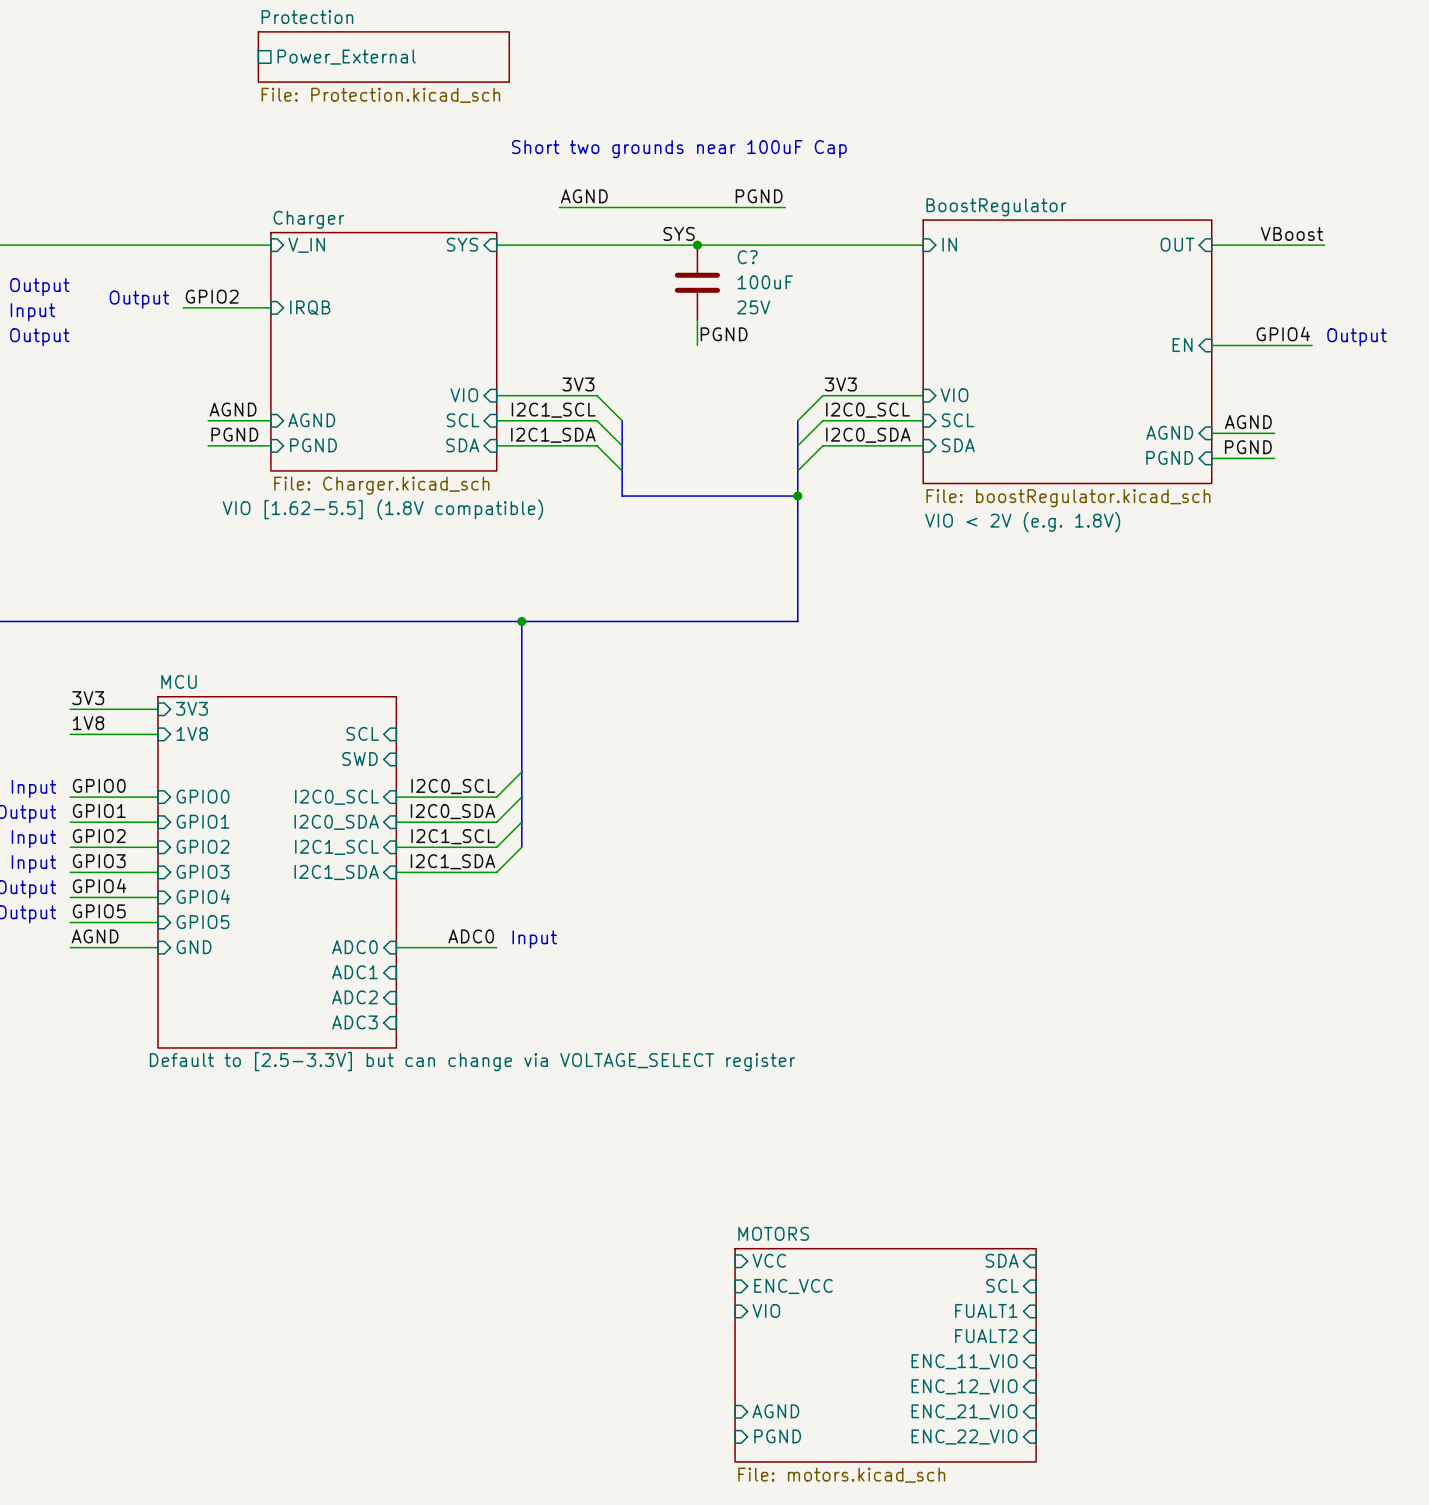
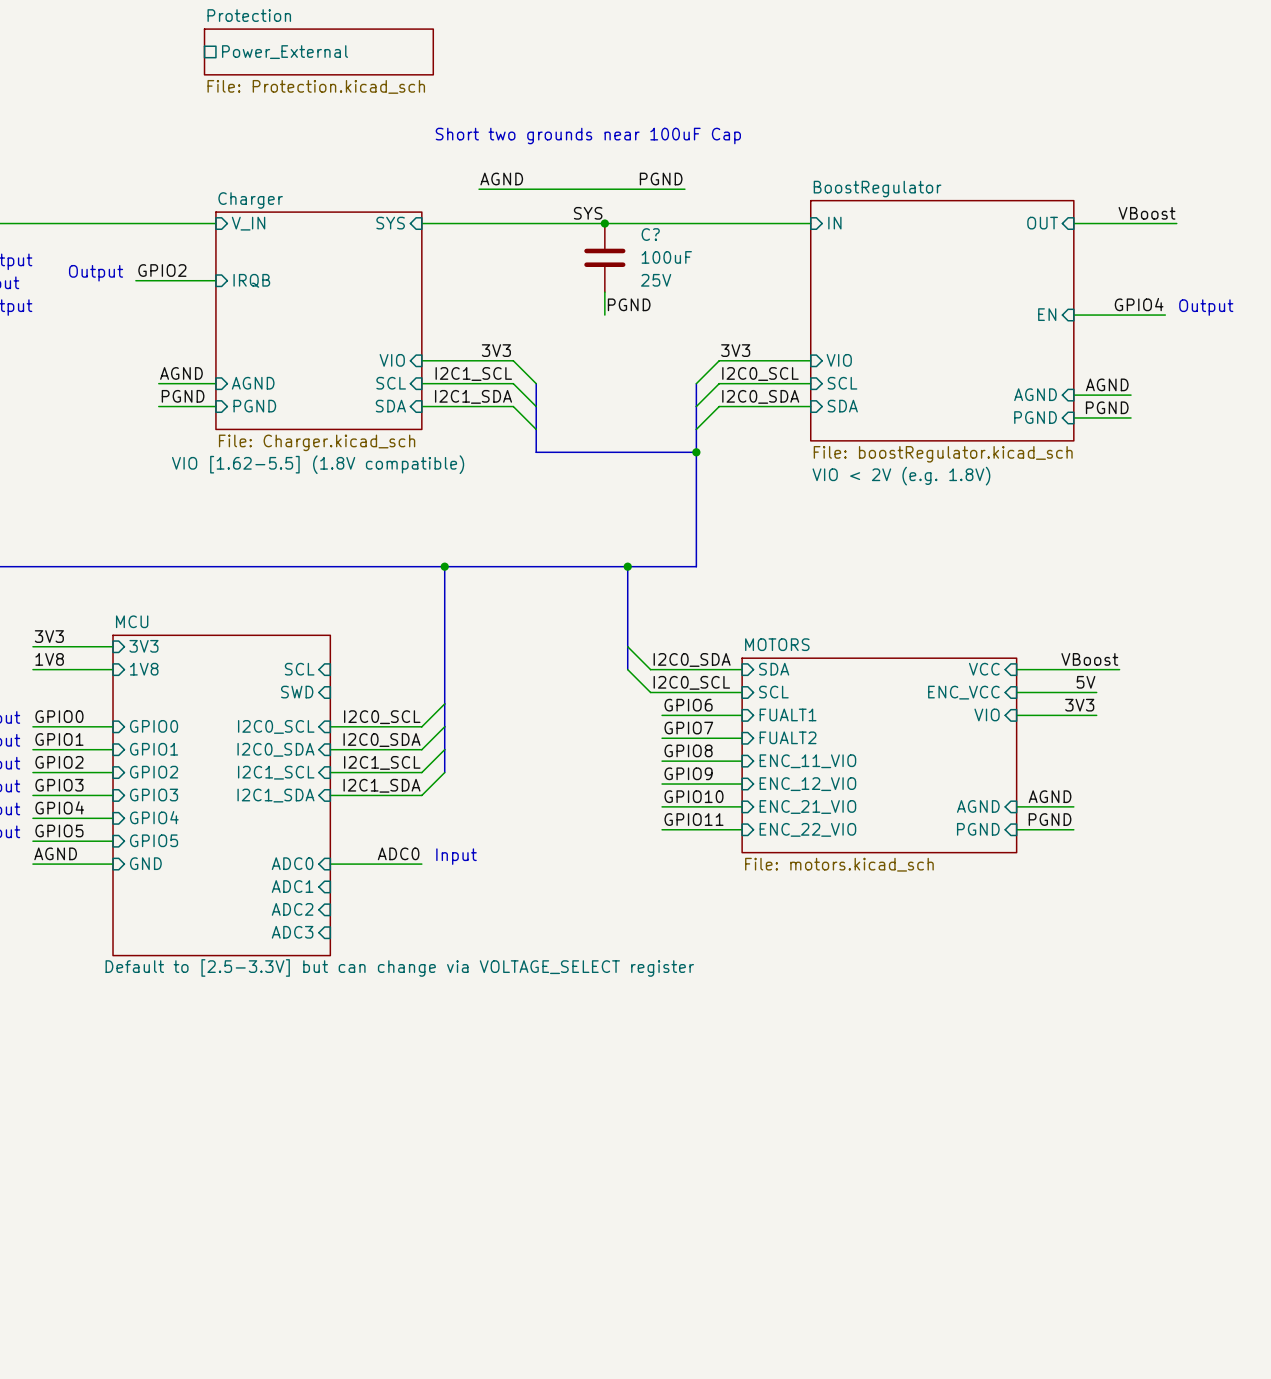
bus: none -> (627, 566) (627, 669)
junction: none -> (627, 566)
wire: none -> (627, 646) (650, 669) (742, 669)
label: none -> I2C0_SDA (692, 659)
label: none -> VBoost (1089, 659)
sheet pin: none -> SDA (774, 669)
sheet pin: none -> VCC (984, 669)
wire: none -> (627, 669) (650, 692) (742, 692)
wire: none -> (1016, 669) (1119, 669)
label: none -> I2C0_SCL (691, 682)
label: none -> 5V (1085, 682)
sheet pin: none -> SCL (773, 692)
sheet pin: none -> ENC_VCC (963, 692)
wire: none -> (1016, 692) (1096, 692)
label: none -> GPIO6 (688, 705)
label: none -> 3V3 (1079, 705)
wire: none -> (662, 715) (742, 715)
sheet pin: none -> FUALT1 (788, 714)
sheet pin: none -> VIO (987, 714)
wire: none -> (1016, 715) (1096, 715)
label: none -> GPIO7 (688, 728)
wire: none -> (662, 738) (742, 738)
sheet pin: none -> FUALT2 (788, 737)
label: none -> GPIO8 (688, 750)
sheet MOTORS: none -> File: motors.kicad_sch (879, 755)
wire: none -> (662, 761) (742, 761)
sheet pin: none -> ENC_11_VIO (807, 761)
label: none -> GPIO9 (688, 773)
wire: none -> (662, 784) (742, 784)
sheet pin: none -> ENC_12_VIO (807, 784)
label: none -> GPIO10 (693, 796)
label: none -> AGND (1050, 796)
wire: none -> (662, 806) (742, 806)
sheet pin: none -> AGND (978, 806)
wire: none -> (1016, 806) (1073, 806)
sheet pin: none -> ENC_21_VIO (807, 807)
label: none -> GPIO11 (693, 819)
label: none -> PGND (1050, 819)
sheet pin: none -> PGND (978, 829)
wire: none -> (662, 829) (742, 829)
sheet pin: none -> ENC_22_VIO (807, 829)
wire: none -> (1016, 829) (1073, 829)
sheet pin: VCC (769, 1260) -> none
sheet pin: SDA (1002, 1260) -> none
sheet pin: SCL (1002, 1285) -> none
sheet pin: ENC_VCC (793, 1286) -> none
sheet pin: VIO (766, 1310) -> none
sheet pin: FUALT1 (986, 1310) -> none
sheet pin: FUALT2 (986, 1336) -> none
sheet MOTORS: File: motors.kicad_sch (885, 1355) -> none
sheet pin: ENC_11_VIO (964, 1361) -> none
sheet pin: ENC_12_VIO (964, 1386) -> none
sheet pin: AGND (775, 1411) -> none
sheet pin: ENC_21_VIO (964, 1411) -> none
sheet pin: PGND (777, 1436) -> none
sheet pin: ENC_22_VIO (964, 1437) -> none

